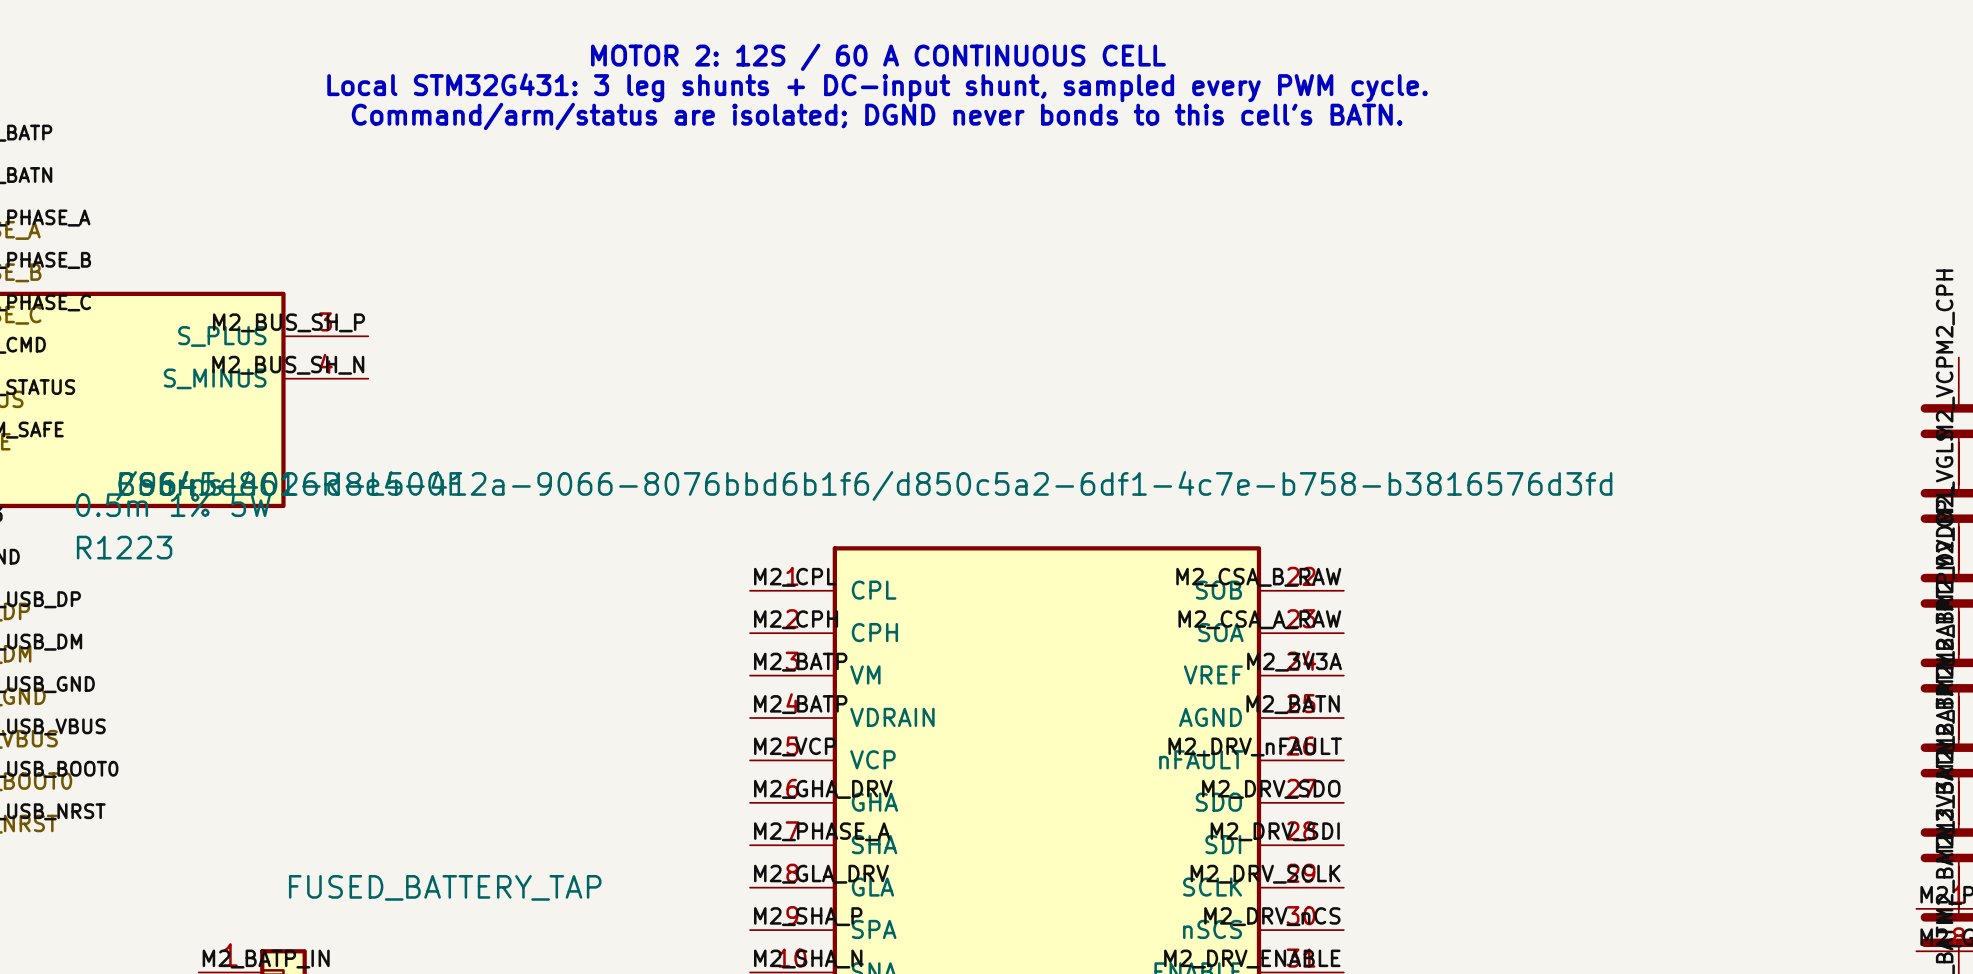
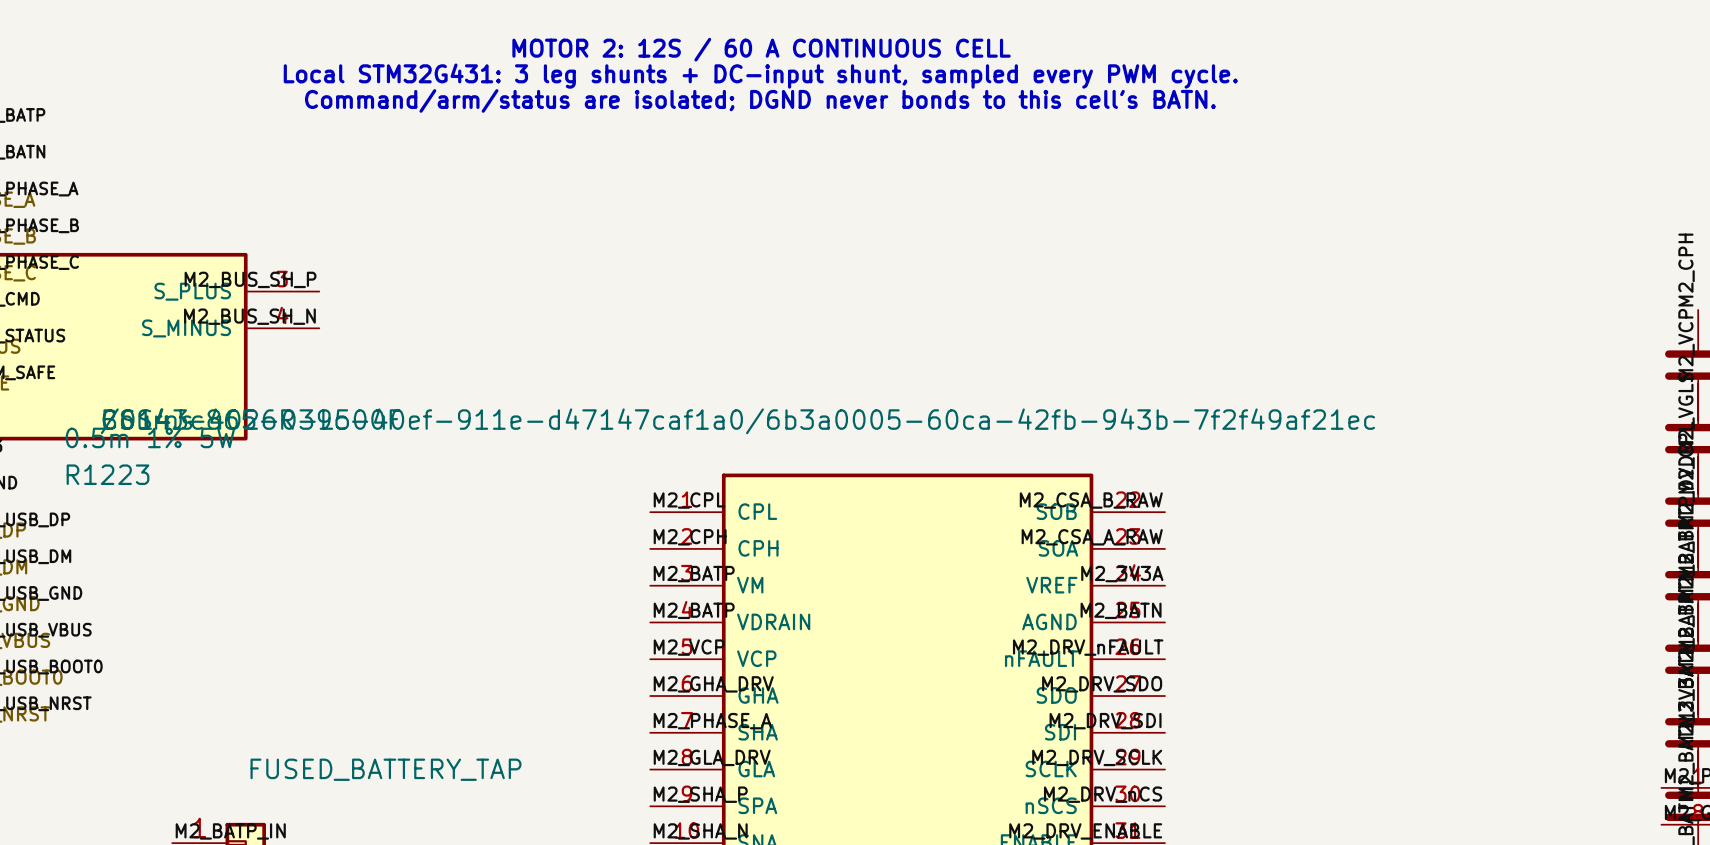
R1223 text: /9645d861-d8e4-412a-9066-8076bbd6b1f6/d850c5a2-6df1-4c7e-b758-b3816576d3fd (864, 485) -> /0143c865-039c-40ef-911e-d47147caf1a0/6b3a0005-60ca-42fb-943b-7f2f49af21ec (737, 421)

